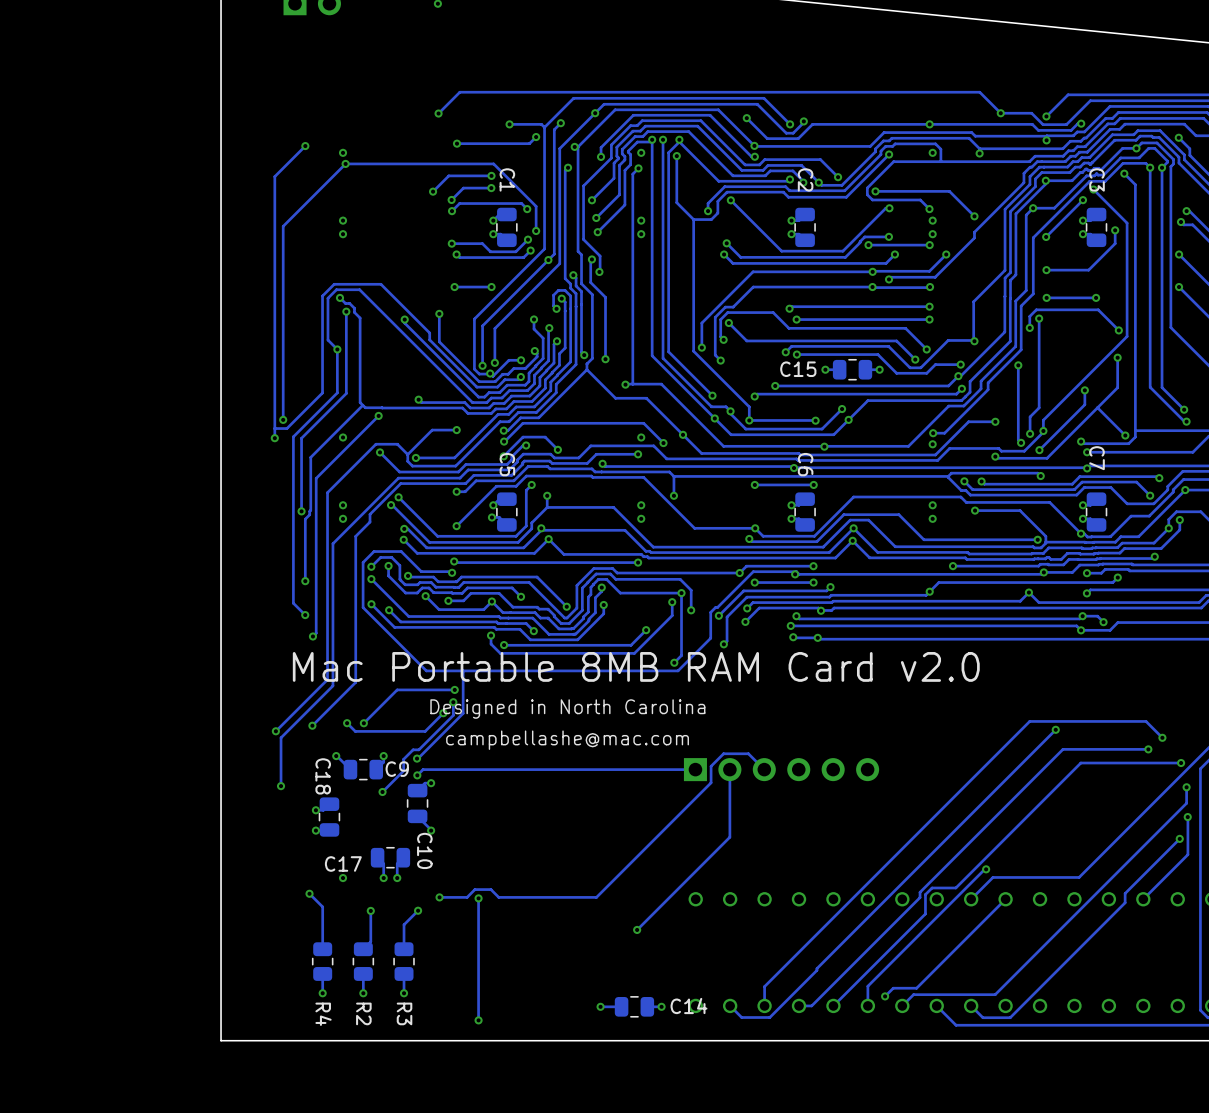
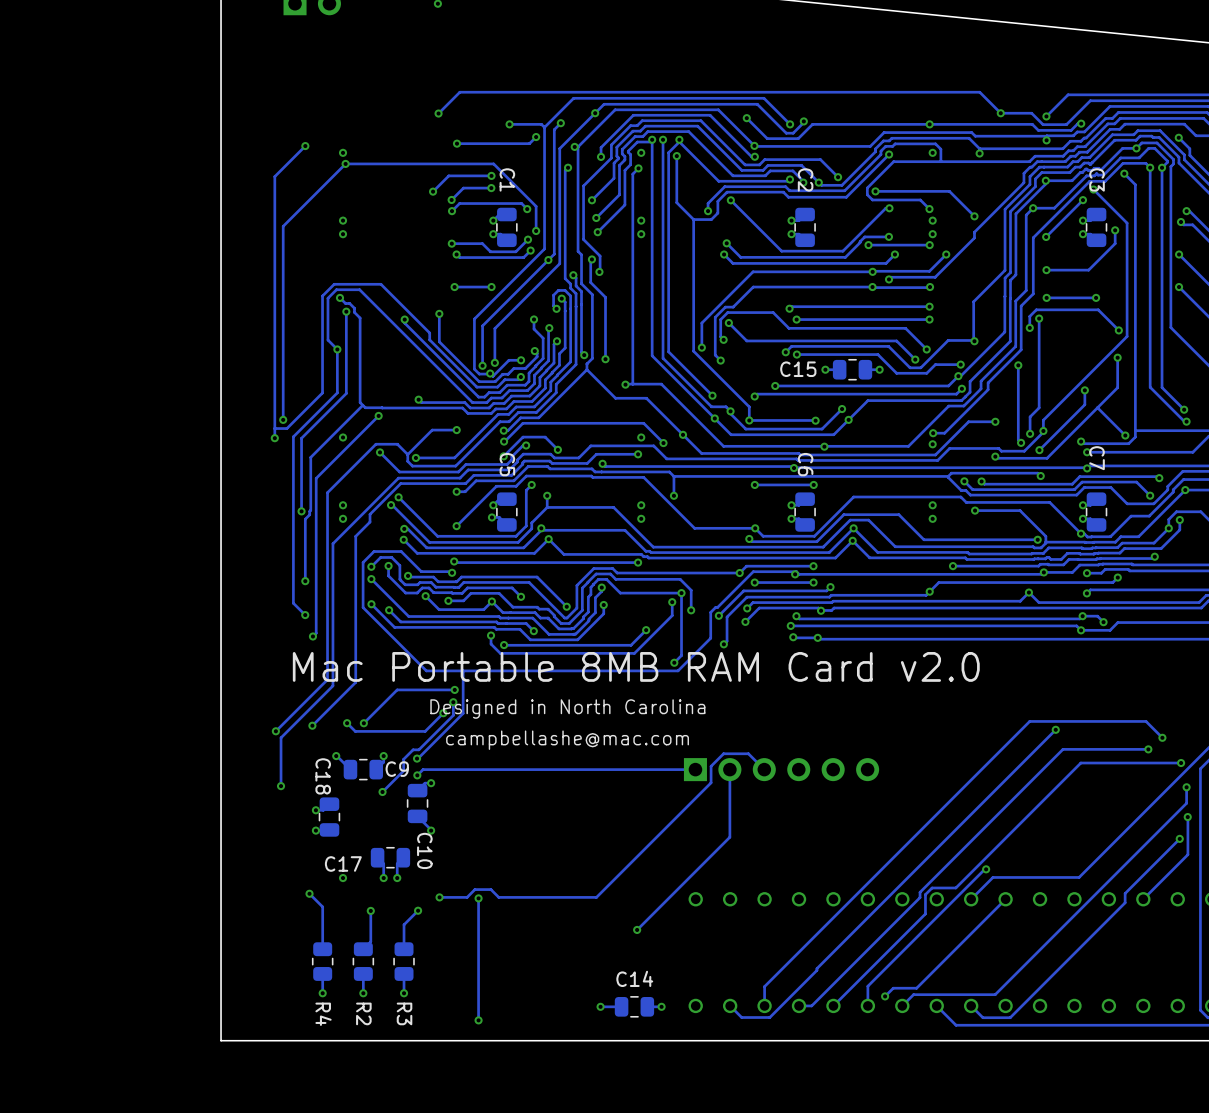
C14 name position: C14 (689, 1005) -> C14 (634, 978)

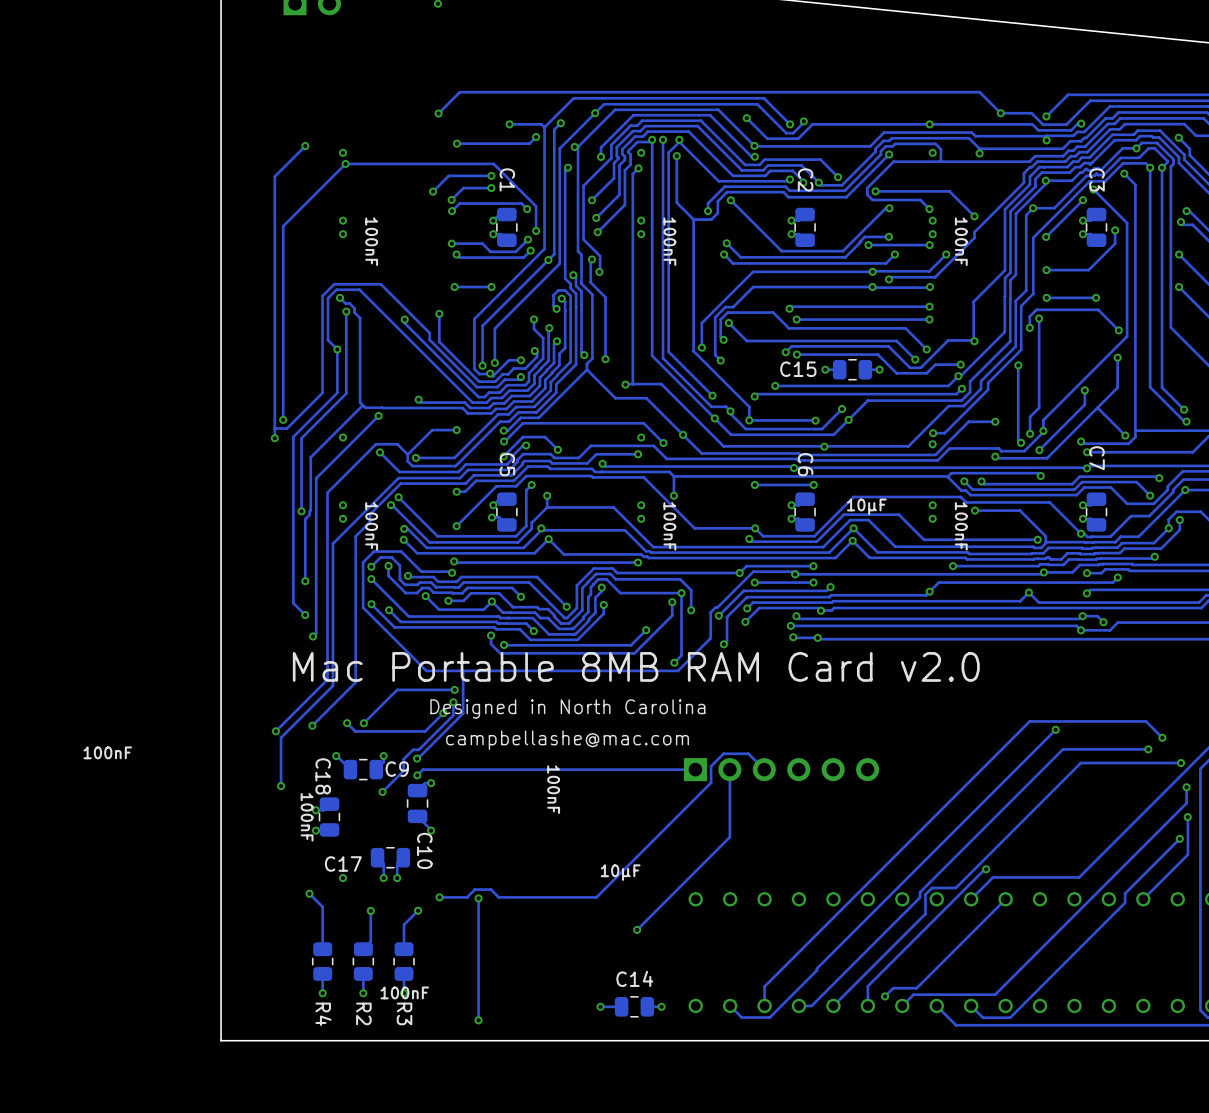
C1 value: none -> 100nF (371, 241)
C2 value: none -> 100nF (669, 241)
C3 value: none -> 100nF (961, 241)
C15 value: none -> 10µF (866, 506)
C5 value: none -> 100nF (371, 526)
C6 value: none -> 100nF (669, 526)
C7 value: none -> 100nF (961, 526)
C9 value: none -> 100nF (107, 752)
C10 value: none -> 100nF (553, 789)
C18 value: none -> 100nF (307, 817)
C14 value: none -> 10µF (620, 872)
C17 value: none -> 100nF (404, 992)

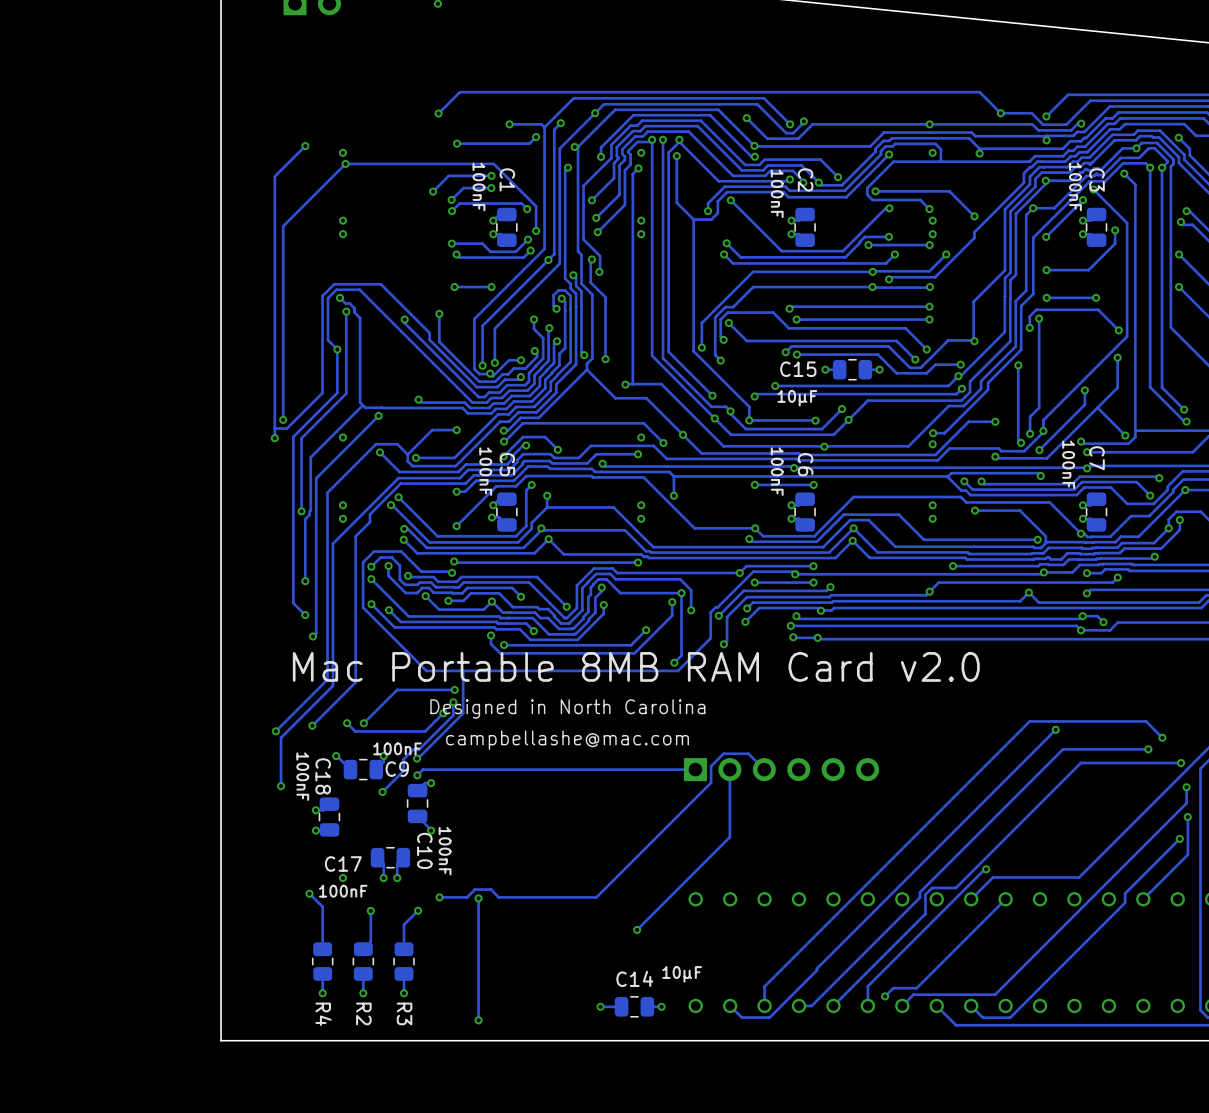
C1 value position: 100nF (371, 241) -> 100nF (478, 186)
C2 value position: 100nF (669, 241) -> 100nF (777, 193)
C3 value position: 100nF (961, 241) -> 100nF (1075, 186)
C15 value position: 10µF (866, 506) -> 10µF (797, 398)
C5 value position: 100nF (371, 526) -> 100nF (485, 471)
C6 value position: 100nF (669, 526) -> 100nF (777, 471)
C7 value position: 100nF (961, 526) -> 100nF (1068, 464)
C9 value position: 100nF (107, 752) -> 100nF (397, 748)
C10 value position: 100nF (553, 789) -> 100nF (445, 851)
C18 value position: 100nF (307, 817) -> 100nF (302, 776)
C14 value position: 10µF (620, 872) -> 10µF (682, 974)
C17 value position: 100nF (404, 992) -> 100nF (343, 891)

